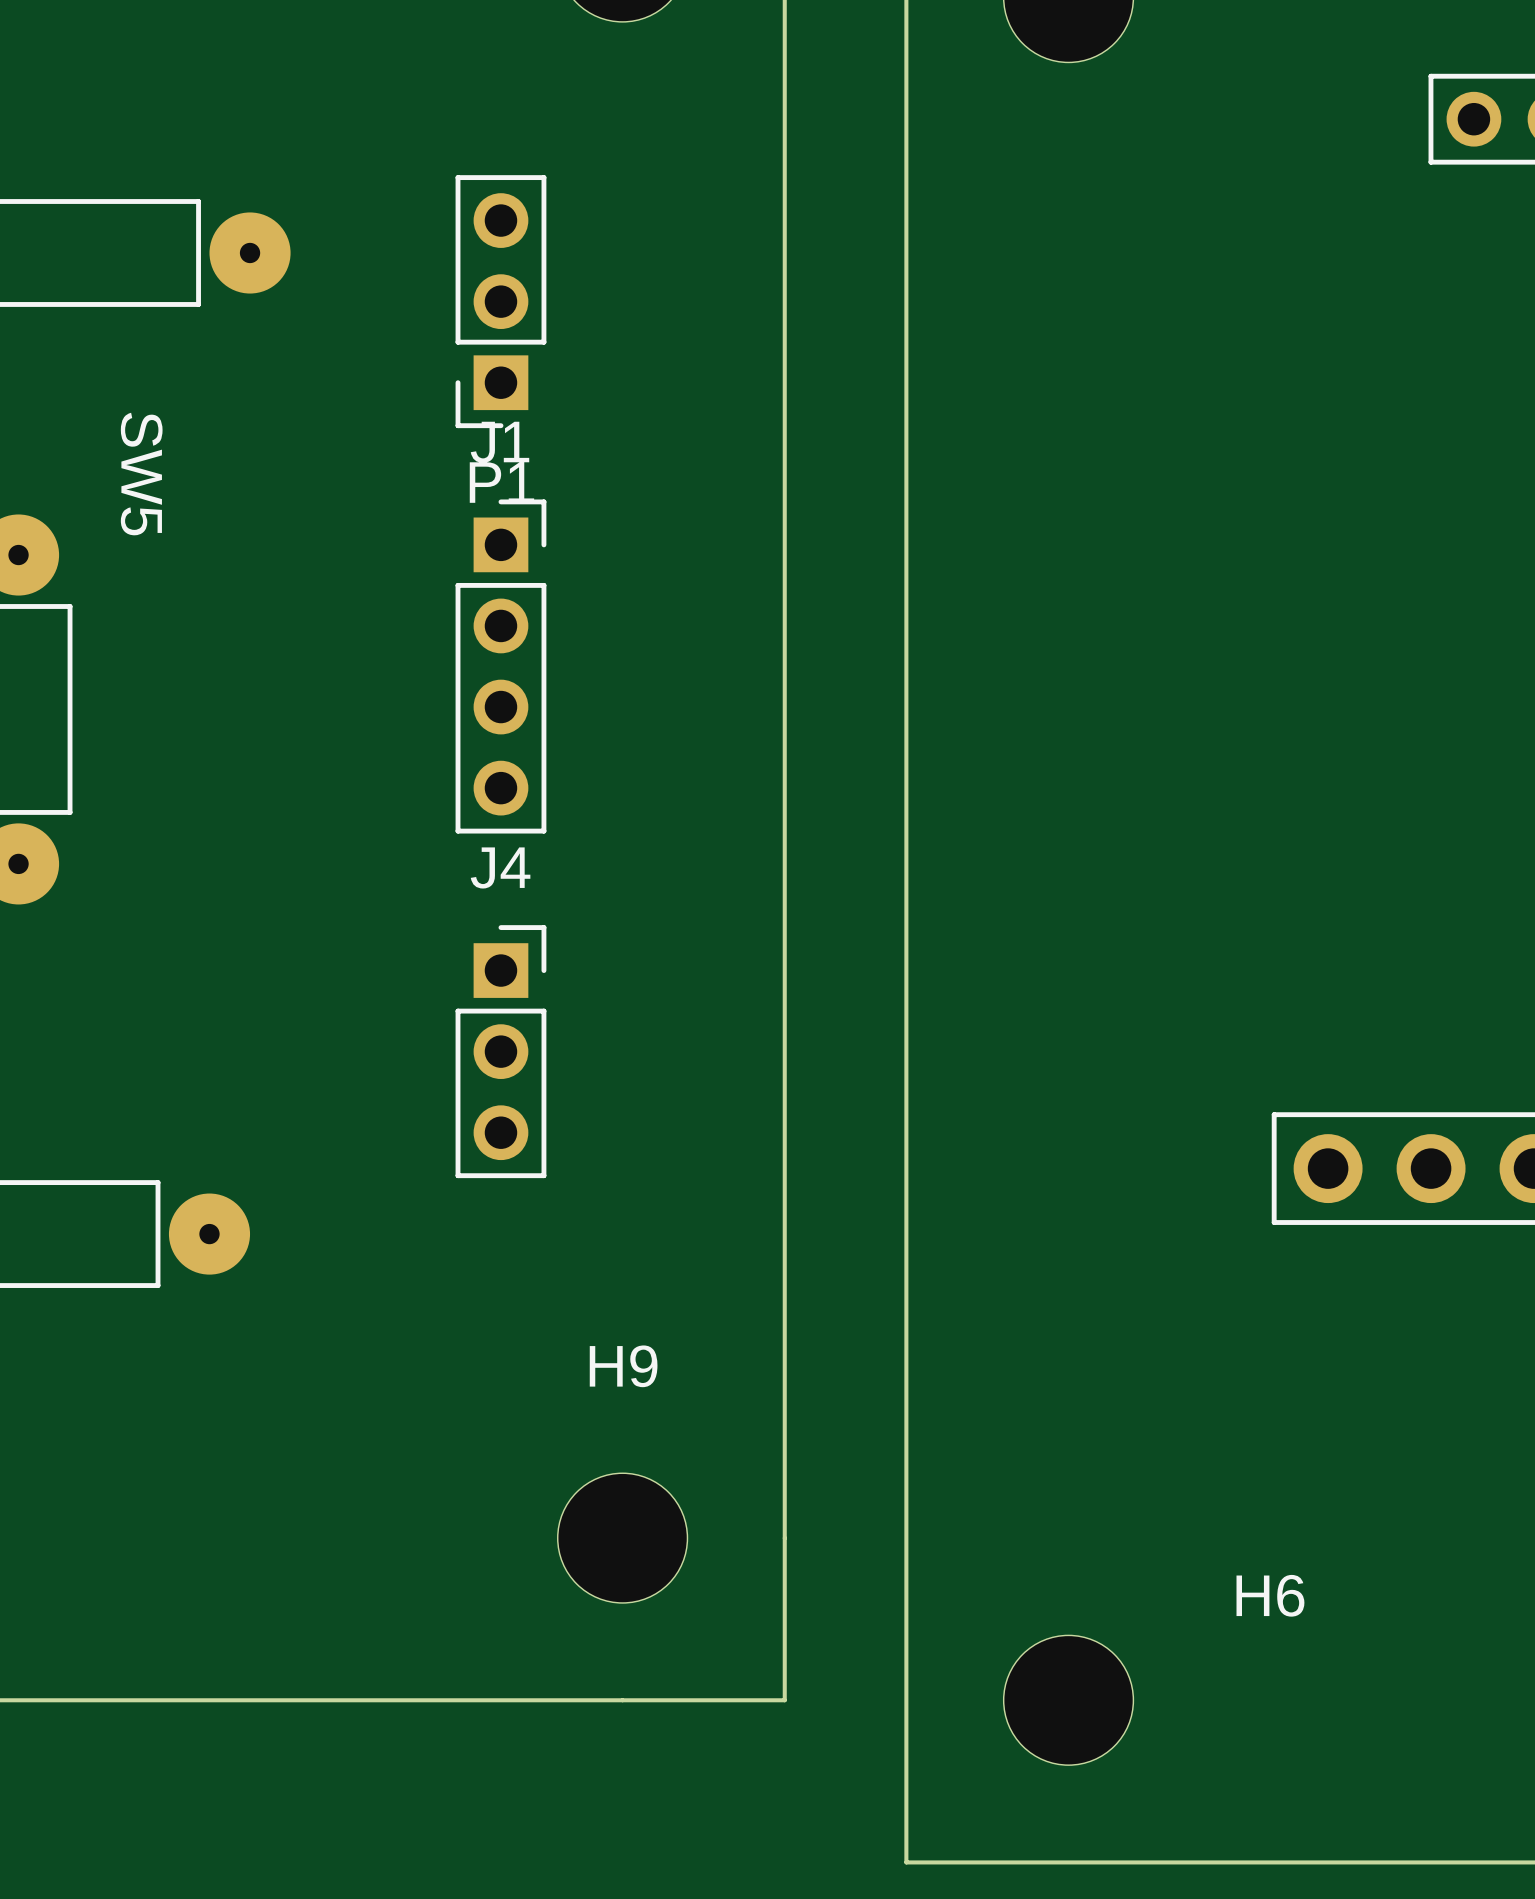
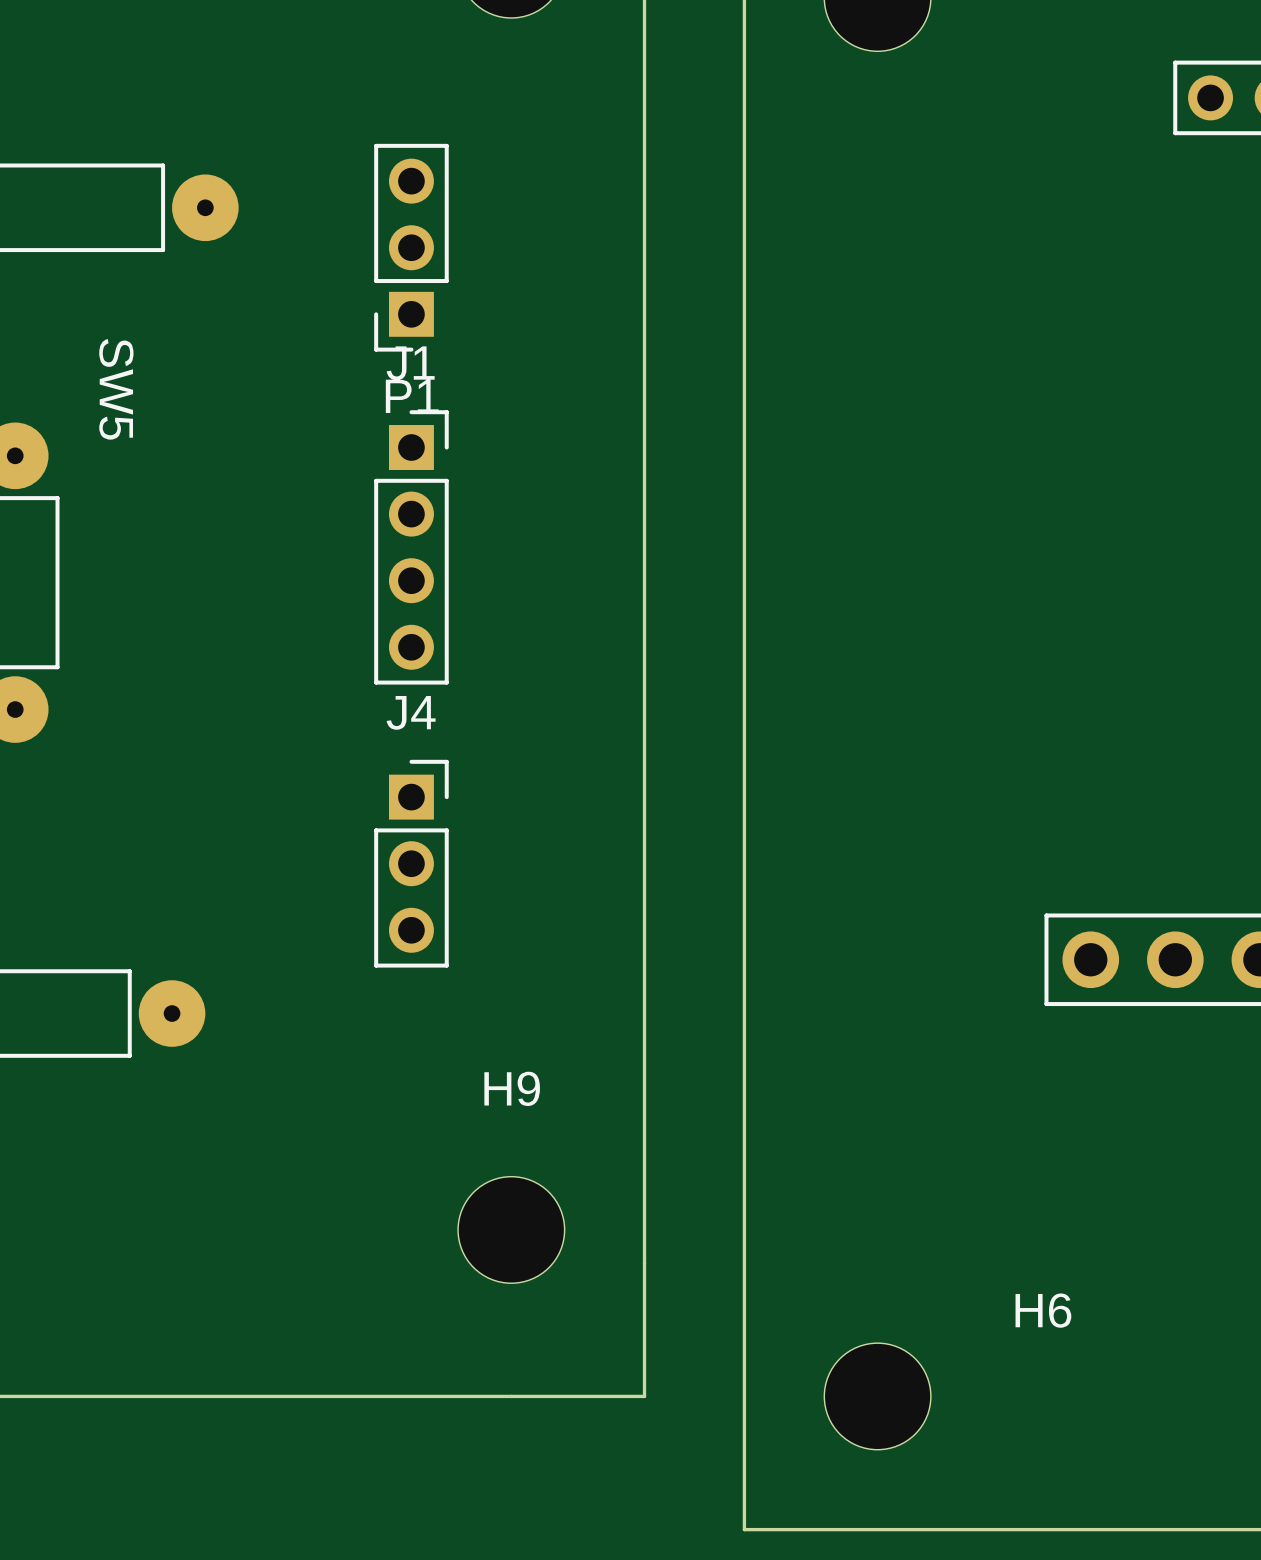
H9 position: (622, 1538) -> (511, 1229)

